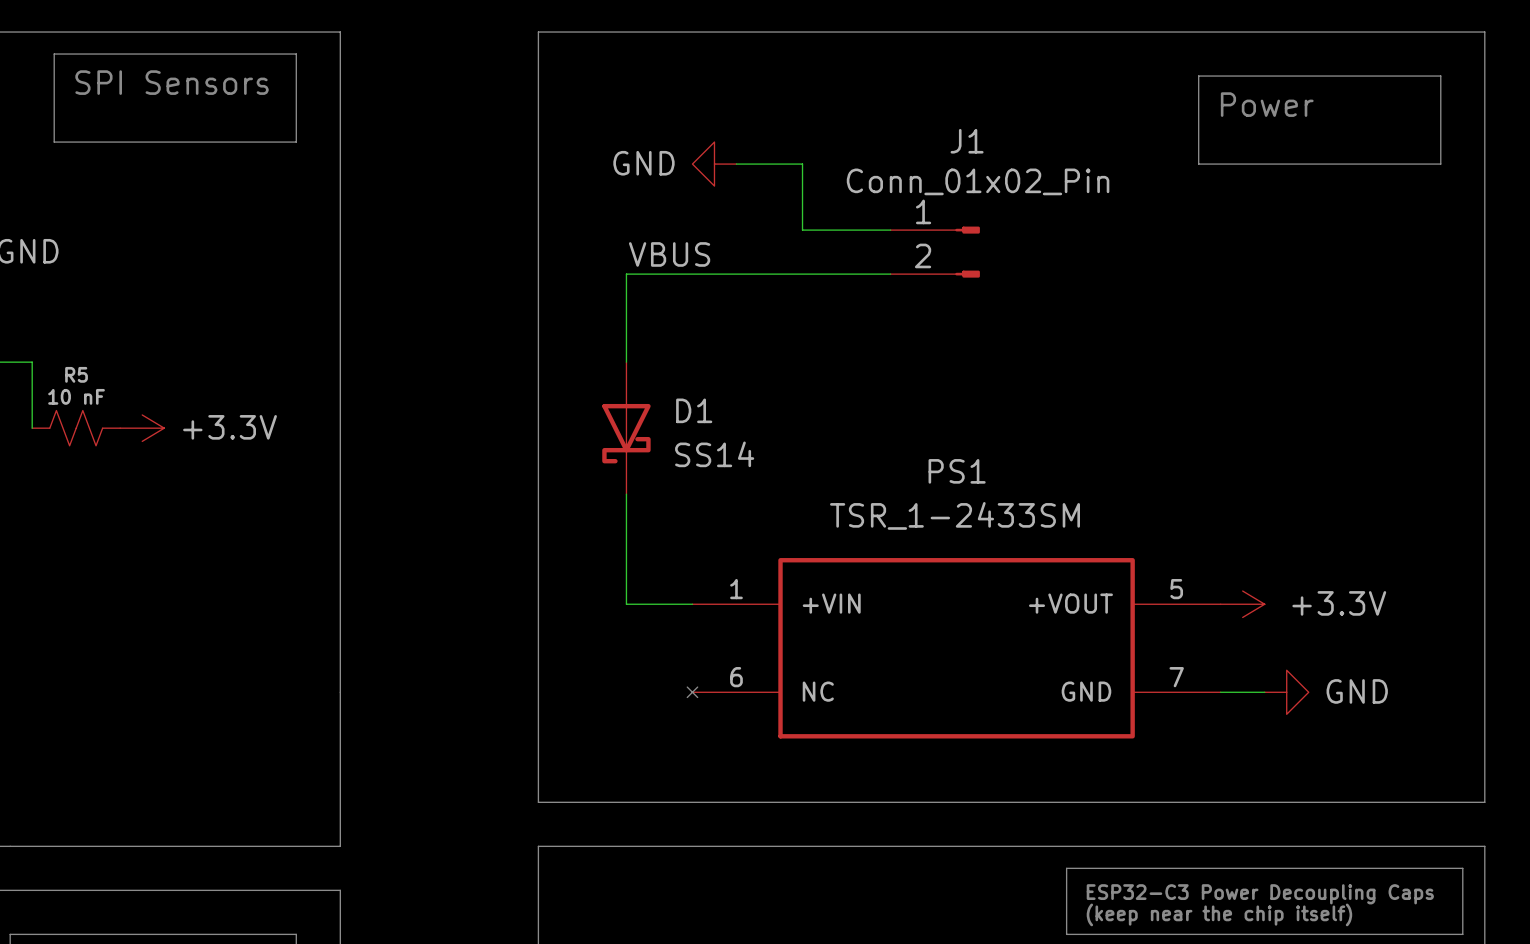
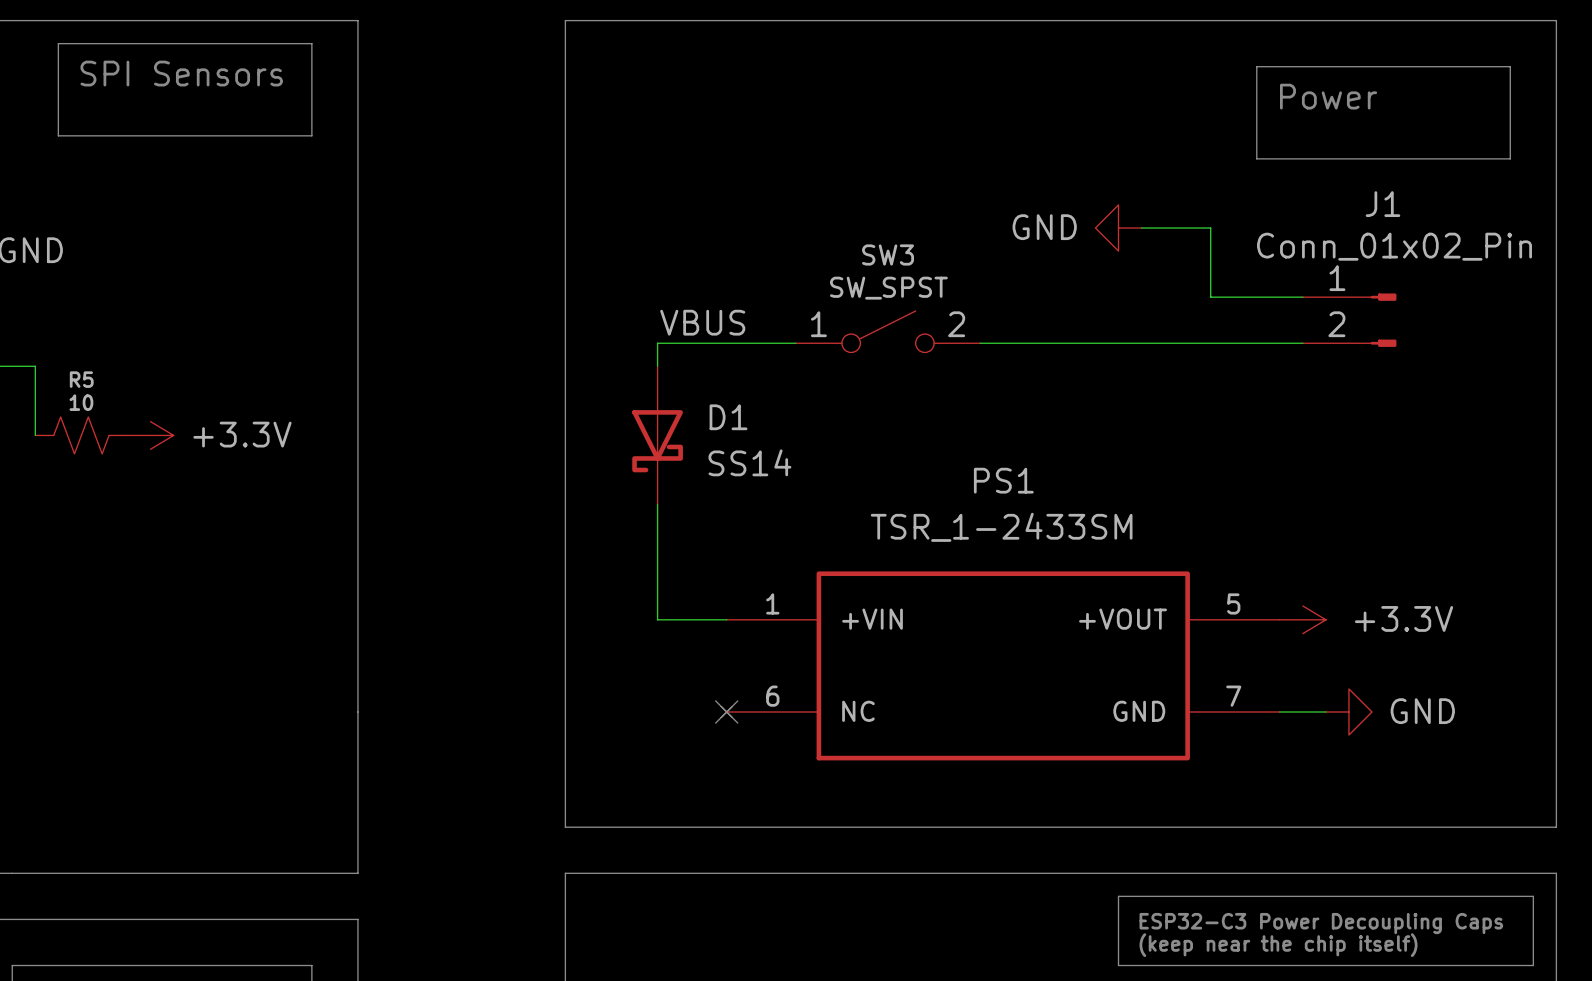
power symbol position: GND (714, 164) -> GND (1118, 228)
wire: (736, 164) (802, 164) (802, 230) (890, 230) -> (1141, 228) (1210, 228) (1210, 297) (1302, 297)
J1 position: (935, 252) -> (1349, 320)
label position: VBUS (669, 254) -> VBUS (702, 322)
wire: (890, 274) (626, 274) (626, 340) -> (795, 343) (657, 343)
SW3: none -> SW_SPST (888, 331)
wire: none -> (980, 343) (1302, 343)
R5 value: 10 nF (76, 396) -> 10 (81, 402)
no-connect mark: none -> (726, 712)

